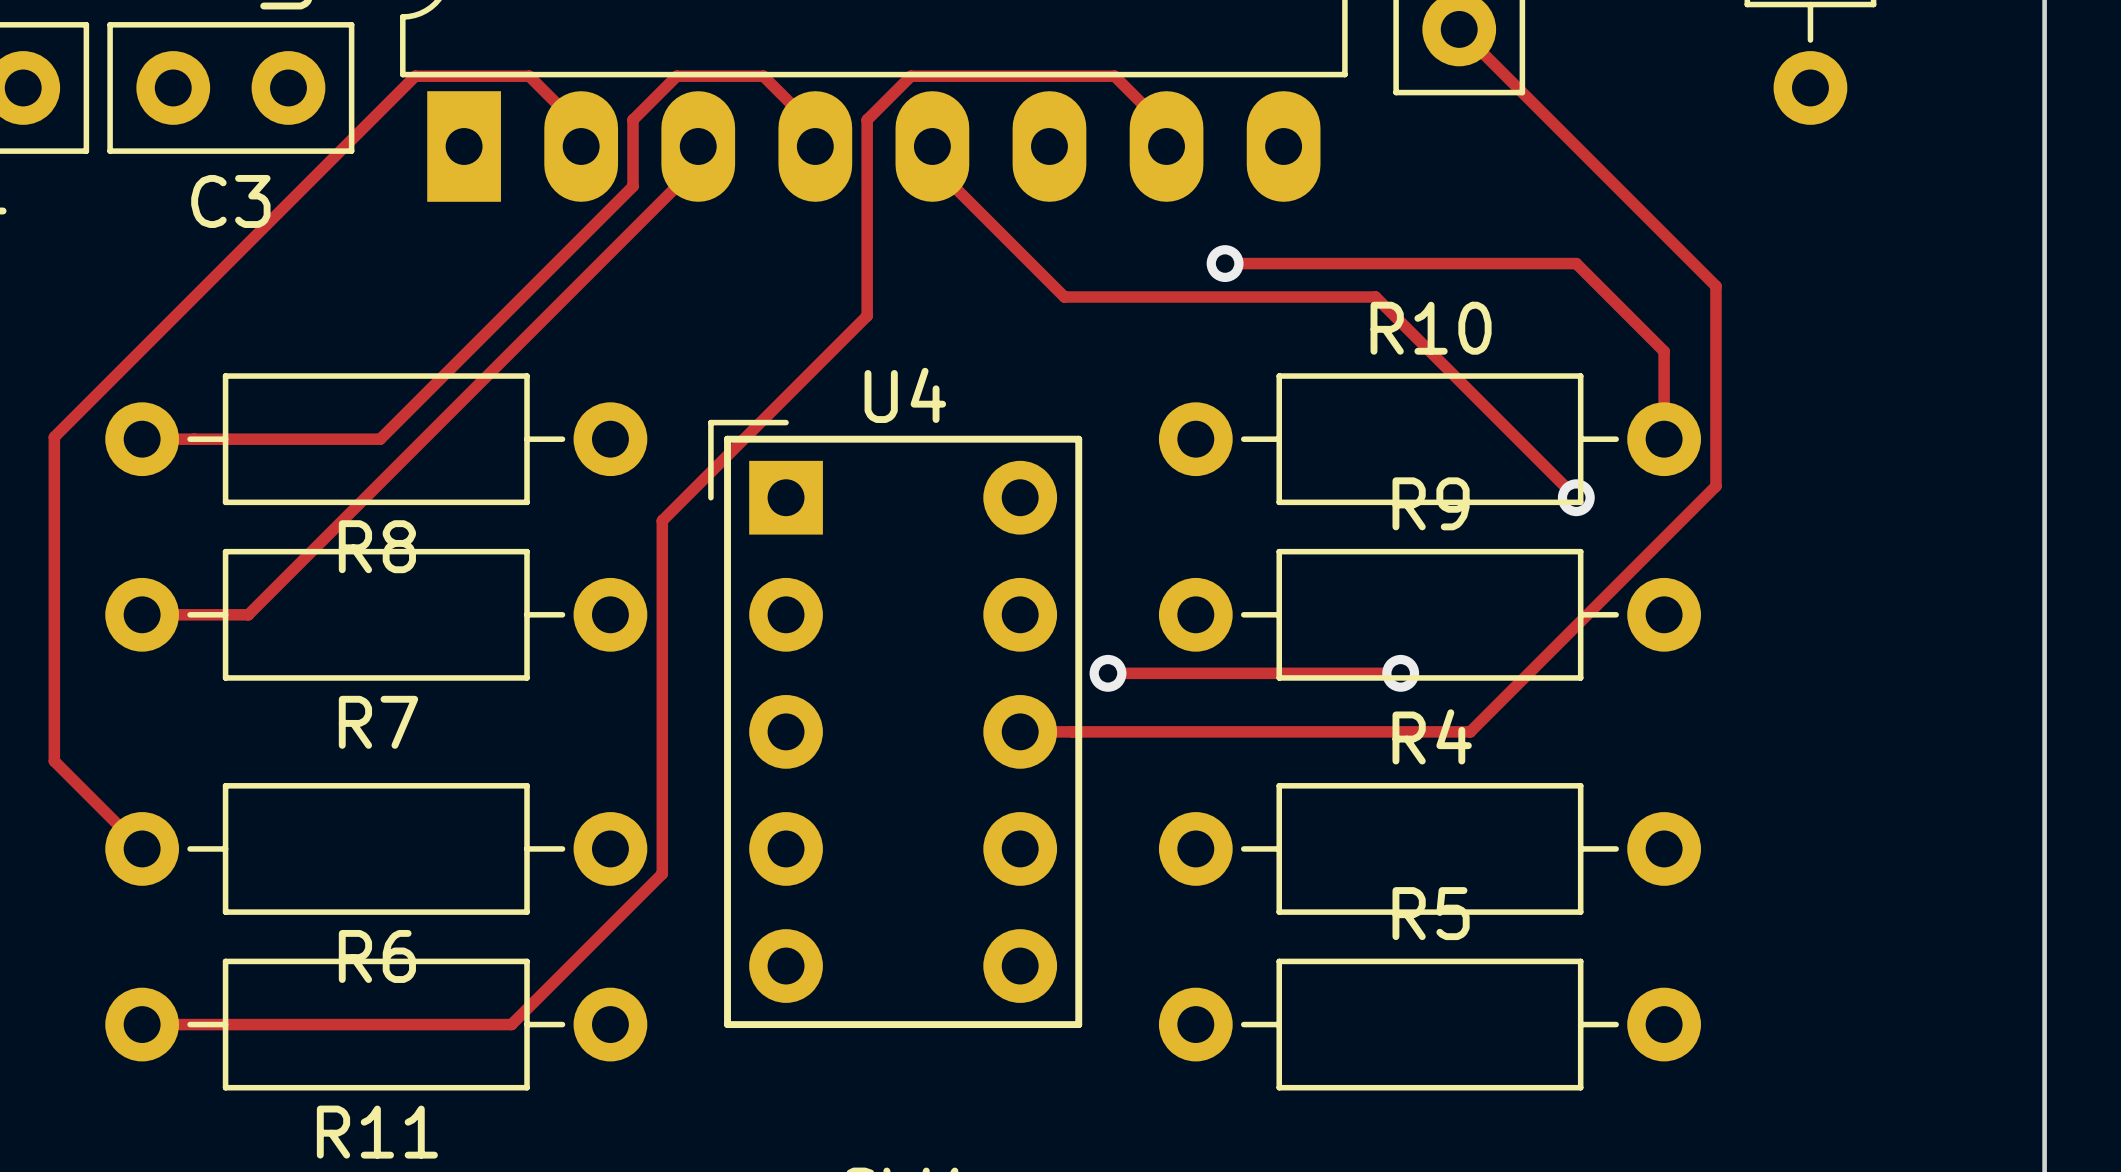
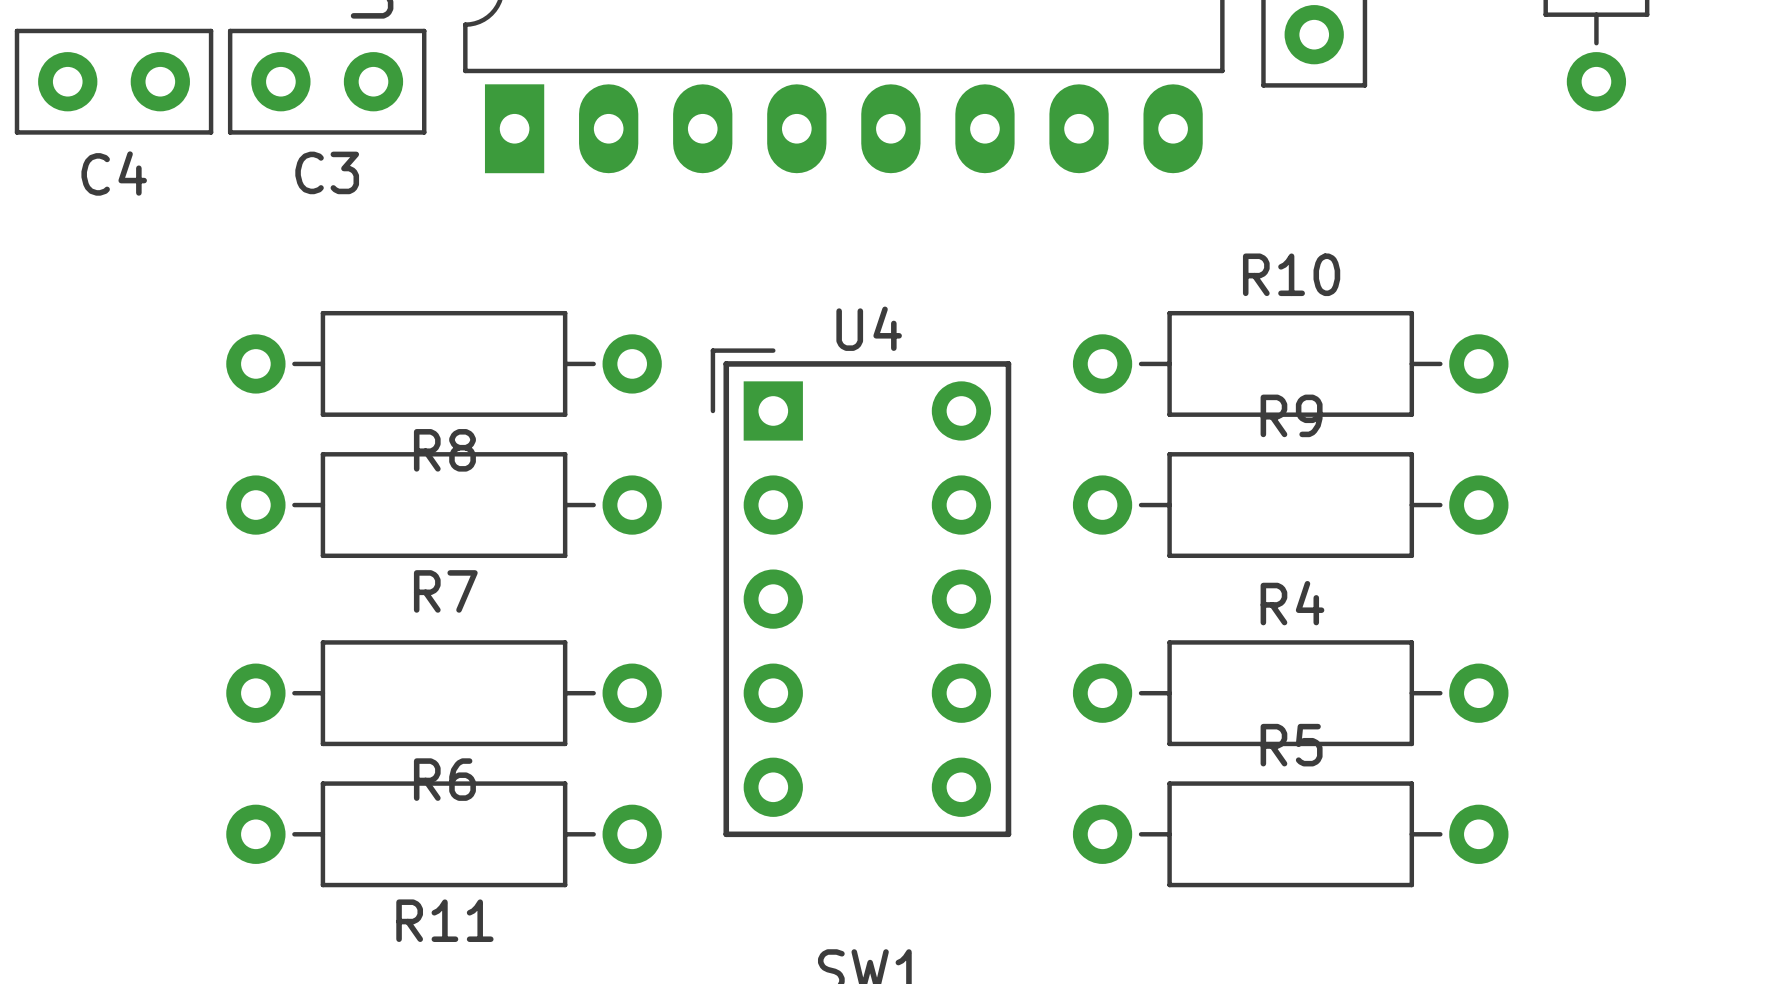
track: (1459, 29) (1715, 286) (1715, 486) (1470, 731) (1020, 731) -> none
track: (581, 146) (581, 128) (529, 76) (415, 76) (54, 437) (54, 761) (142, 848) -> none
track: (698, 146) (698, 164) (248, 614) (142, 614) -> none
track: (815, 146) (815, 128) (763, 76) (676, 76) (633, 119) (633, 186) (380, 439) (142, 439) -> none
track: (932, 146) (932, 164) (1064, 296) (1375, 296) (1576, 497) -> none
track: (1166, 146) (1166, 128) (1114, 76) (910, 76) (867, 119) (867, 315) (662, 520) (662, 873) (511, 1024) (142, 1024) -> none
track: (1225, 263) (1576, 263) (1664, 351) (1664, 439) -> none
via: (1225, 263) -> none
via: (1576, 497) -> none
track: (1108, 673) (1400, 673) -> none
via: (1108, 673) -> none
via: (1400, 673) -> none

